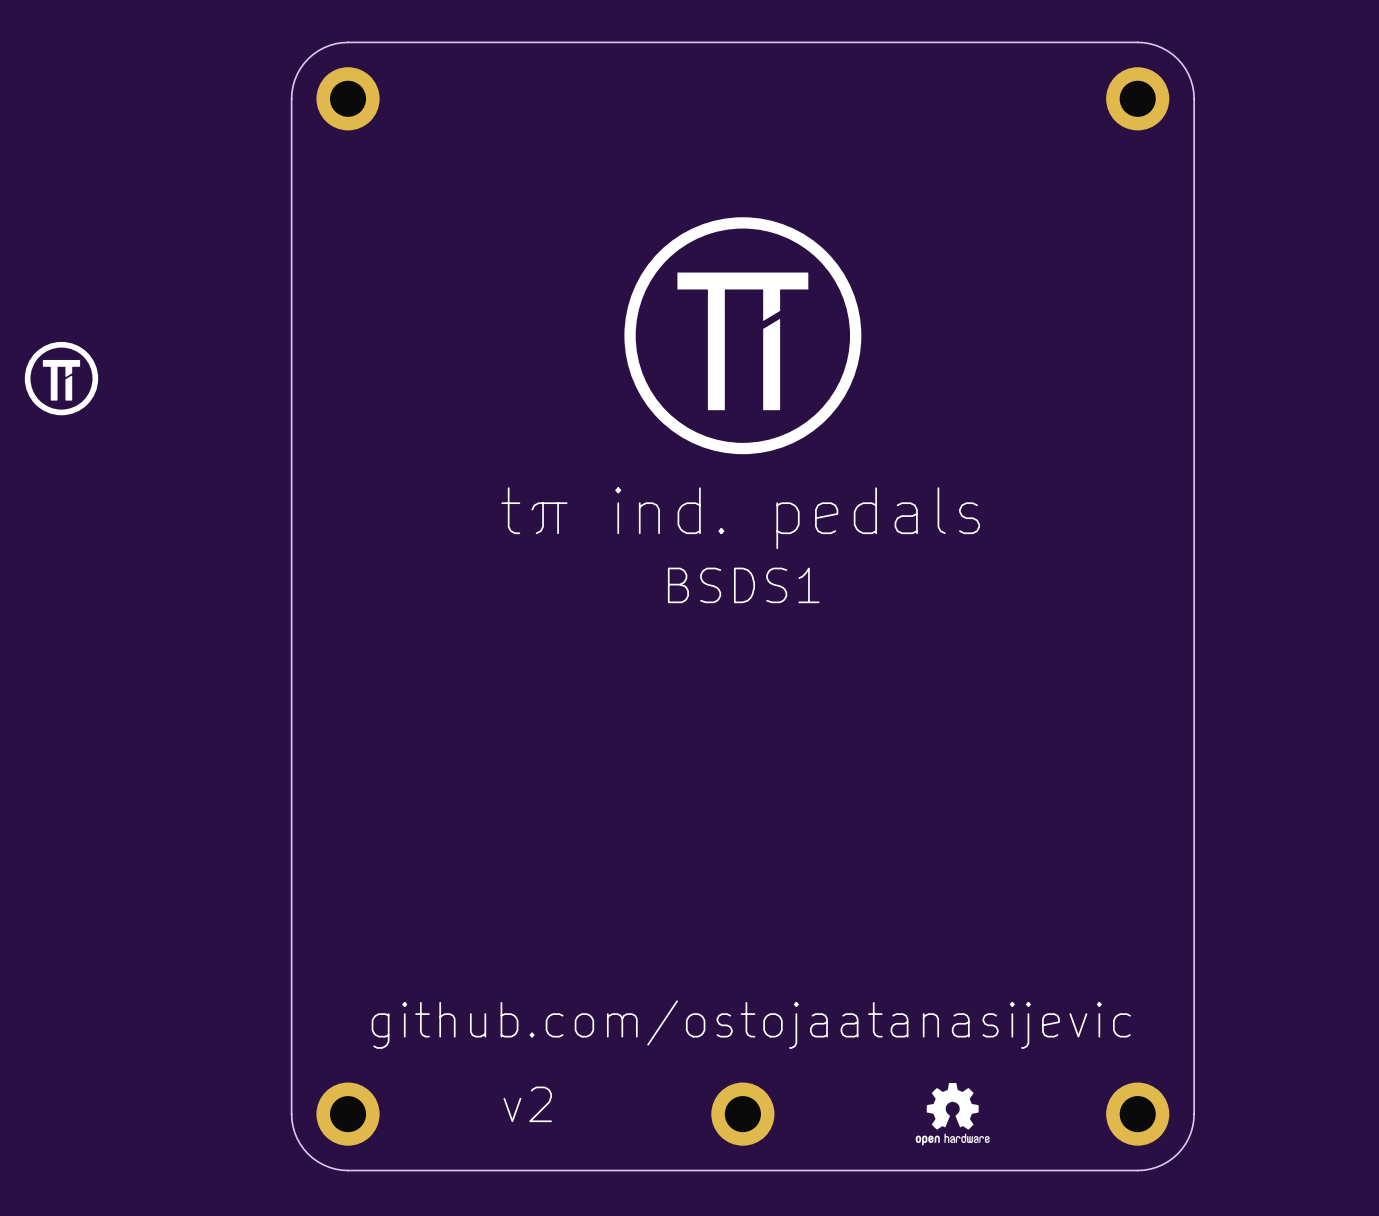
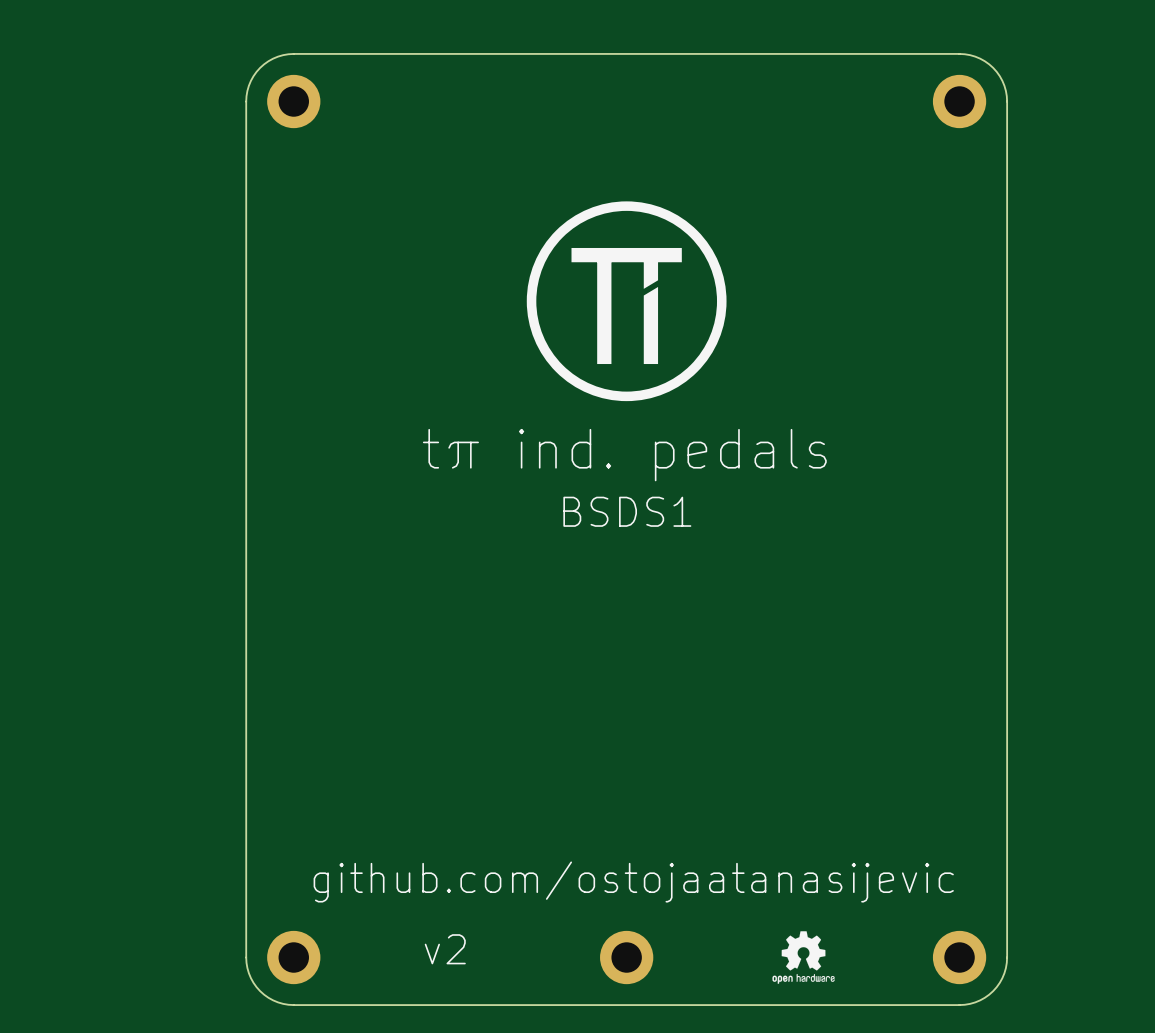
drawing: [24, 341, 99, 416] -> none

